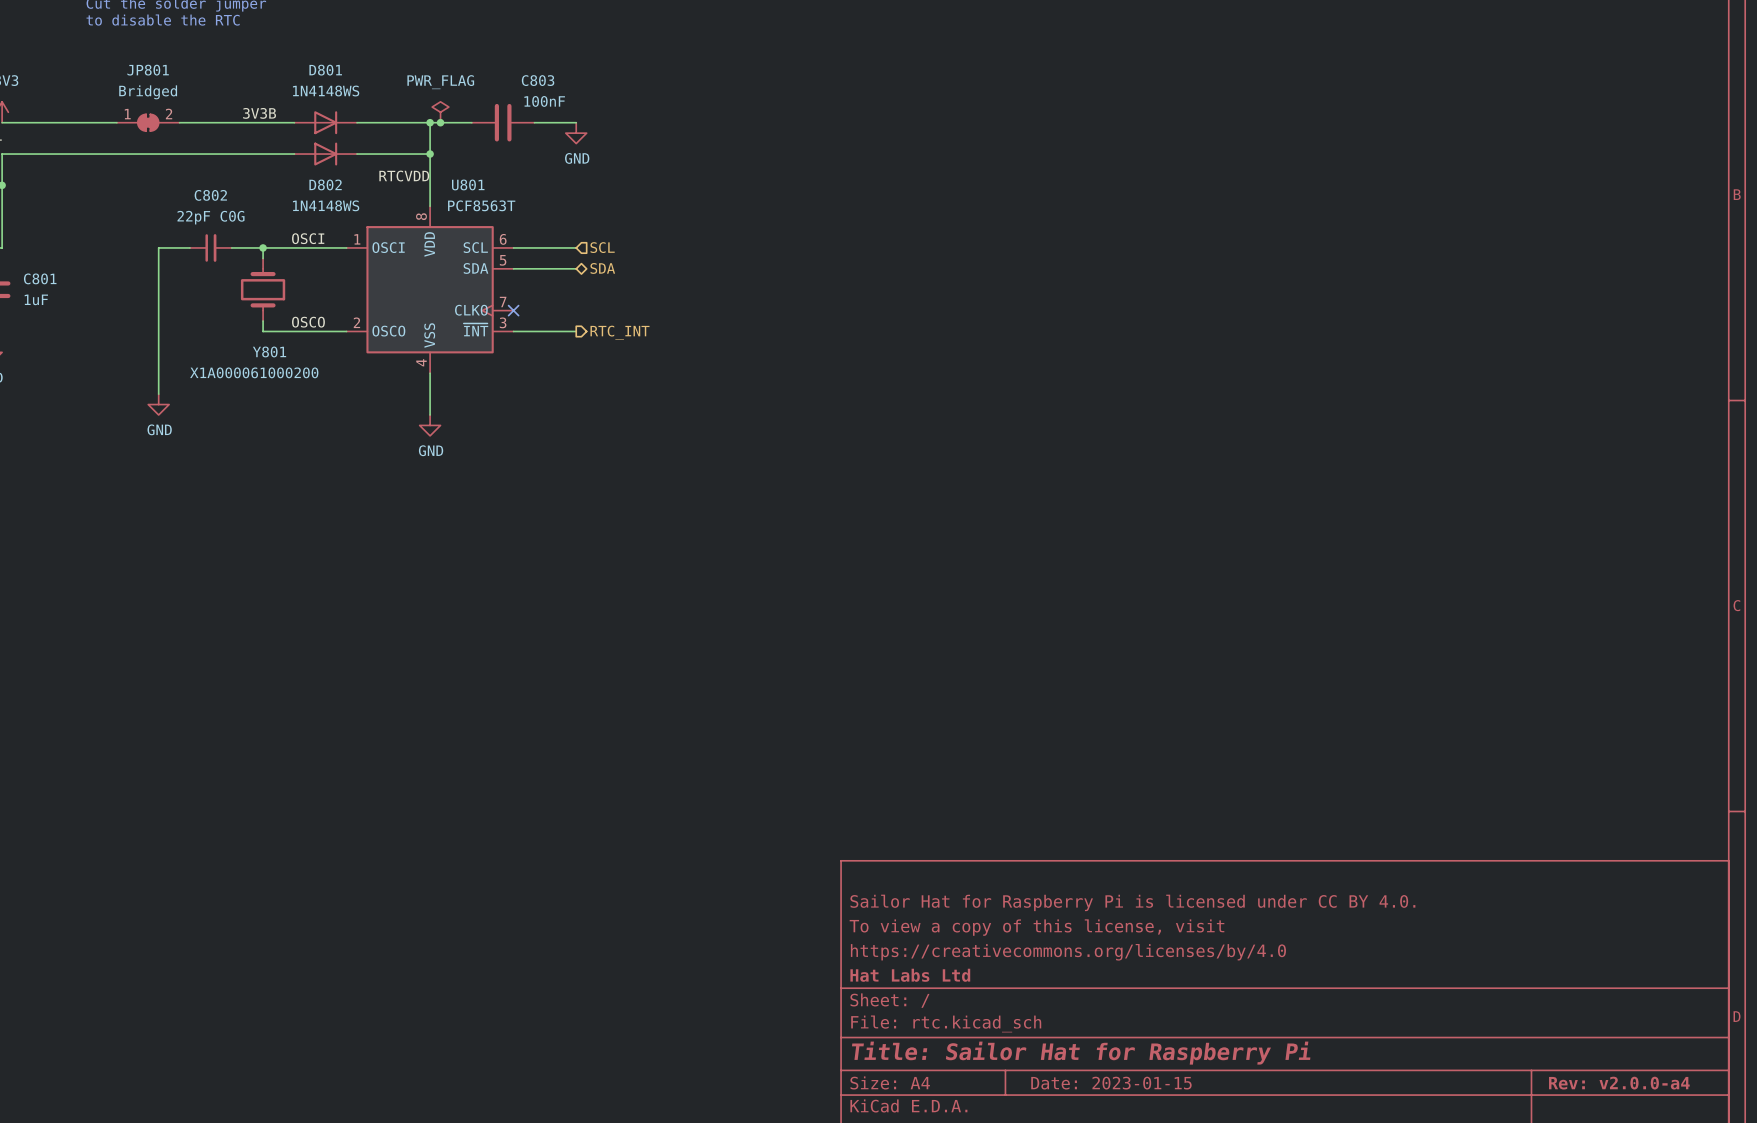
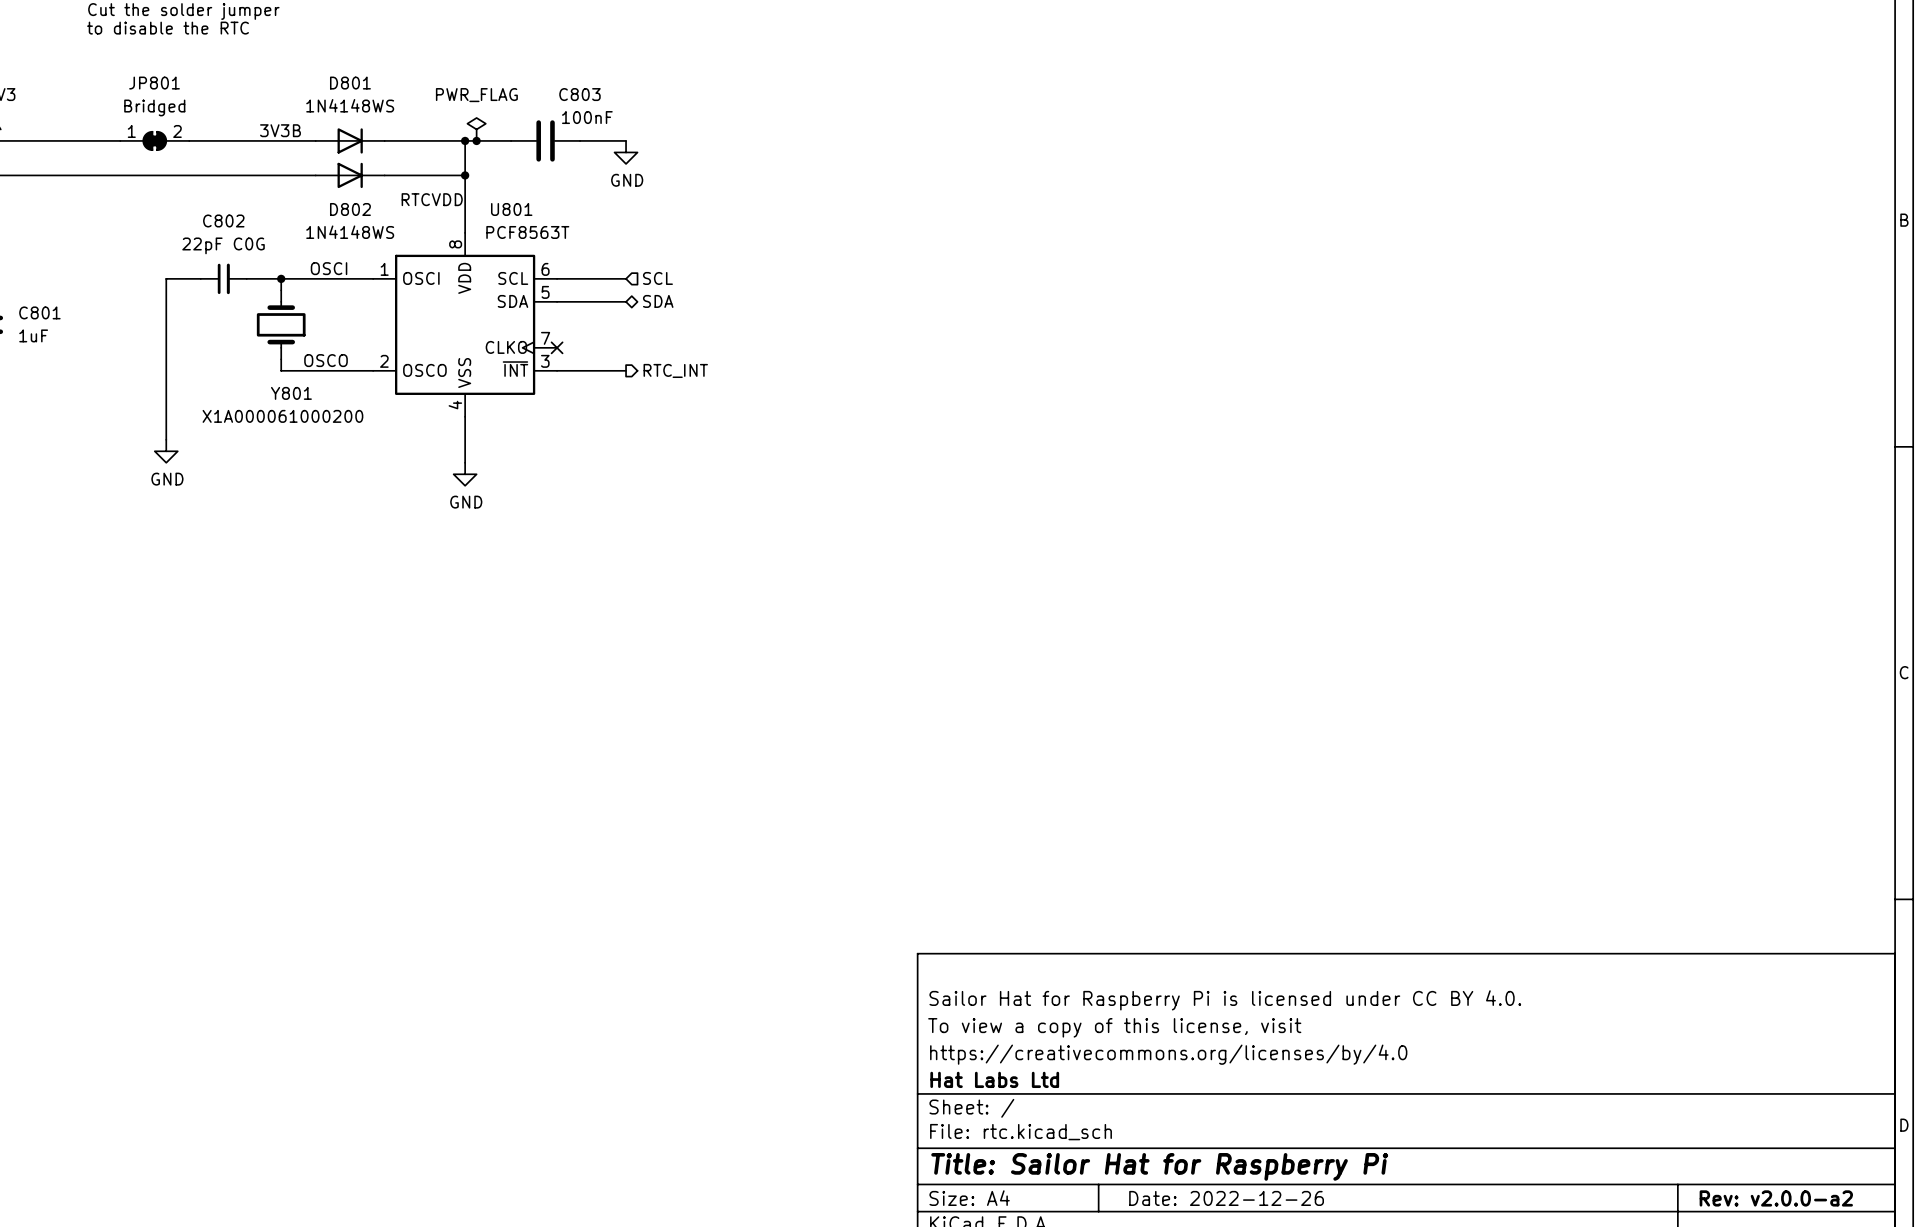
title block: Date: 2023-01-15 (1111, 1083) -> Date: 2022-12-26 (1226, 1198)
title block: Rev: v2.0.0-a4 (1619, 1083) -> Rev: v2.0.0-a2 (1776, 1198)

